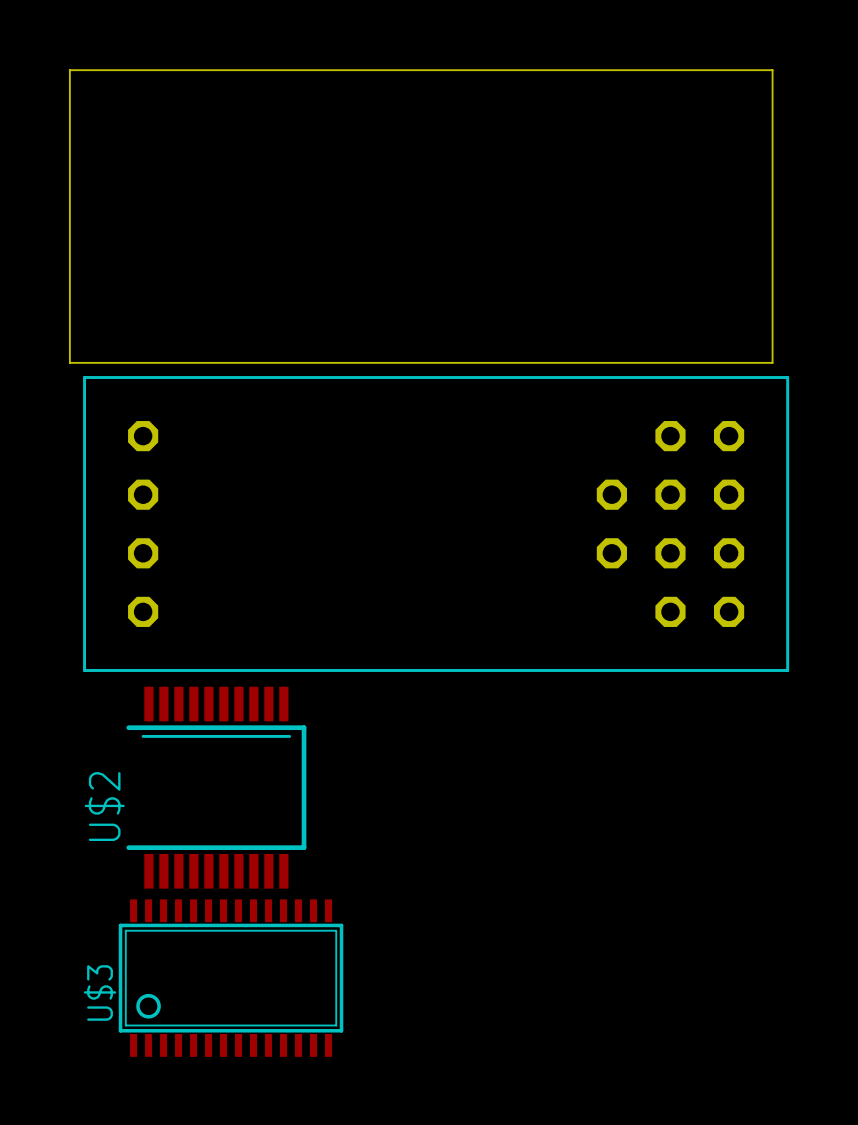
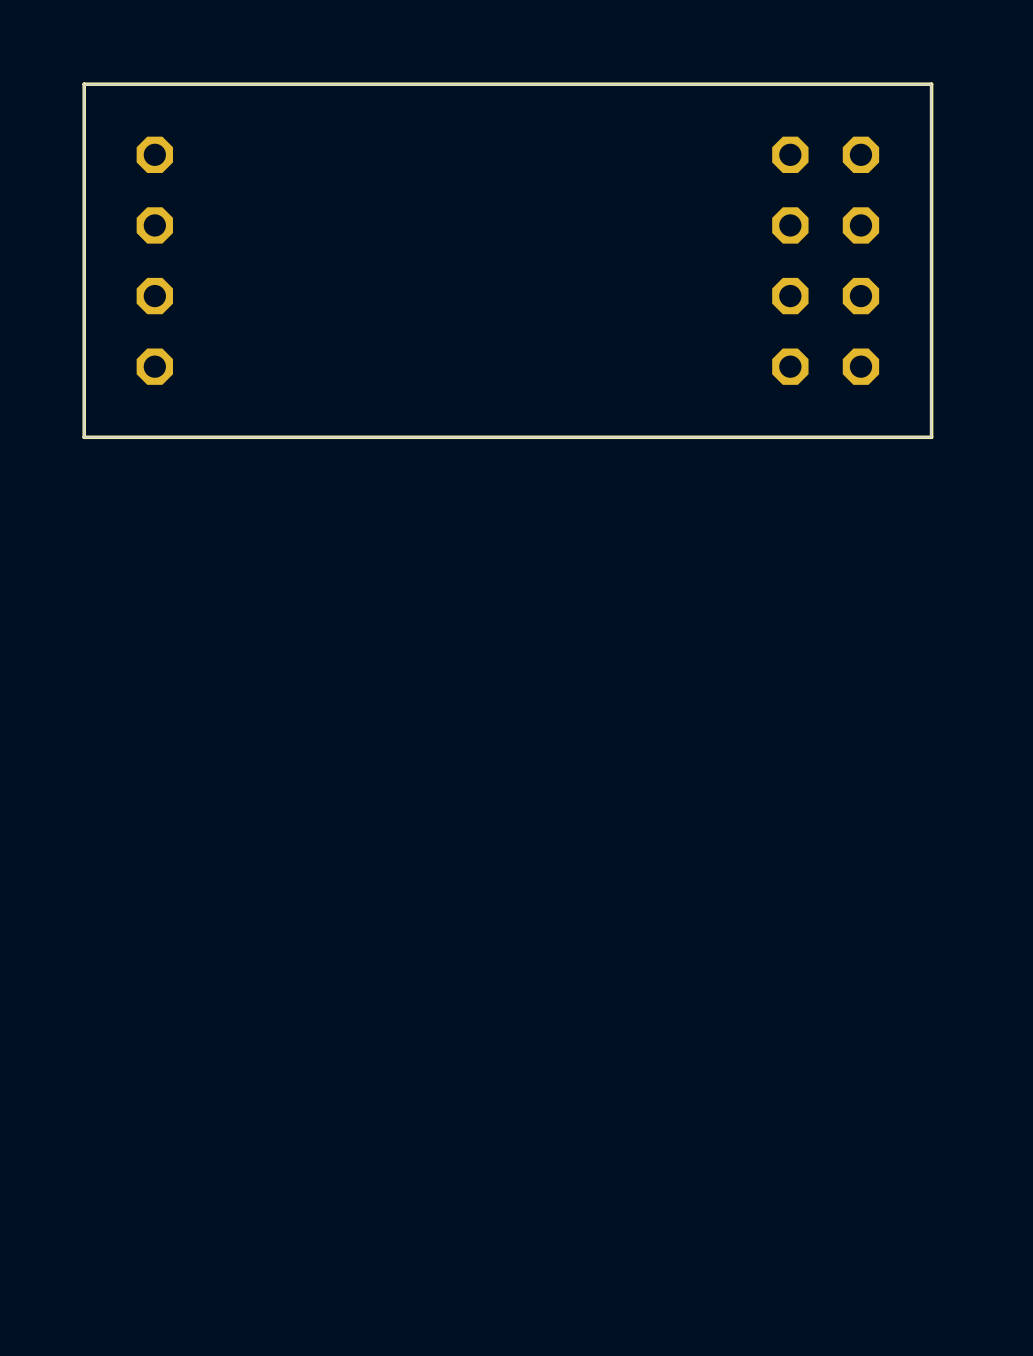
part: none -> (507, 260)
part: (436, 524) -> none
U$2: (216, 787) -> none
U$3: (231, 978) -> none

